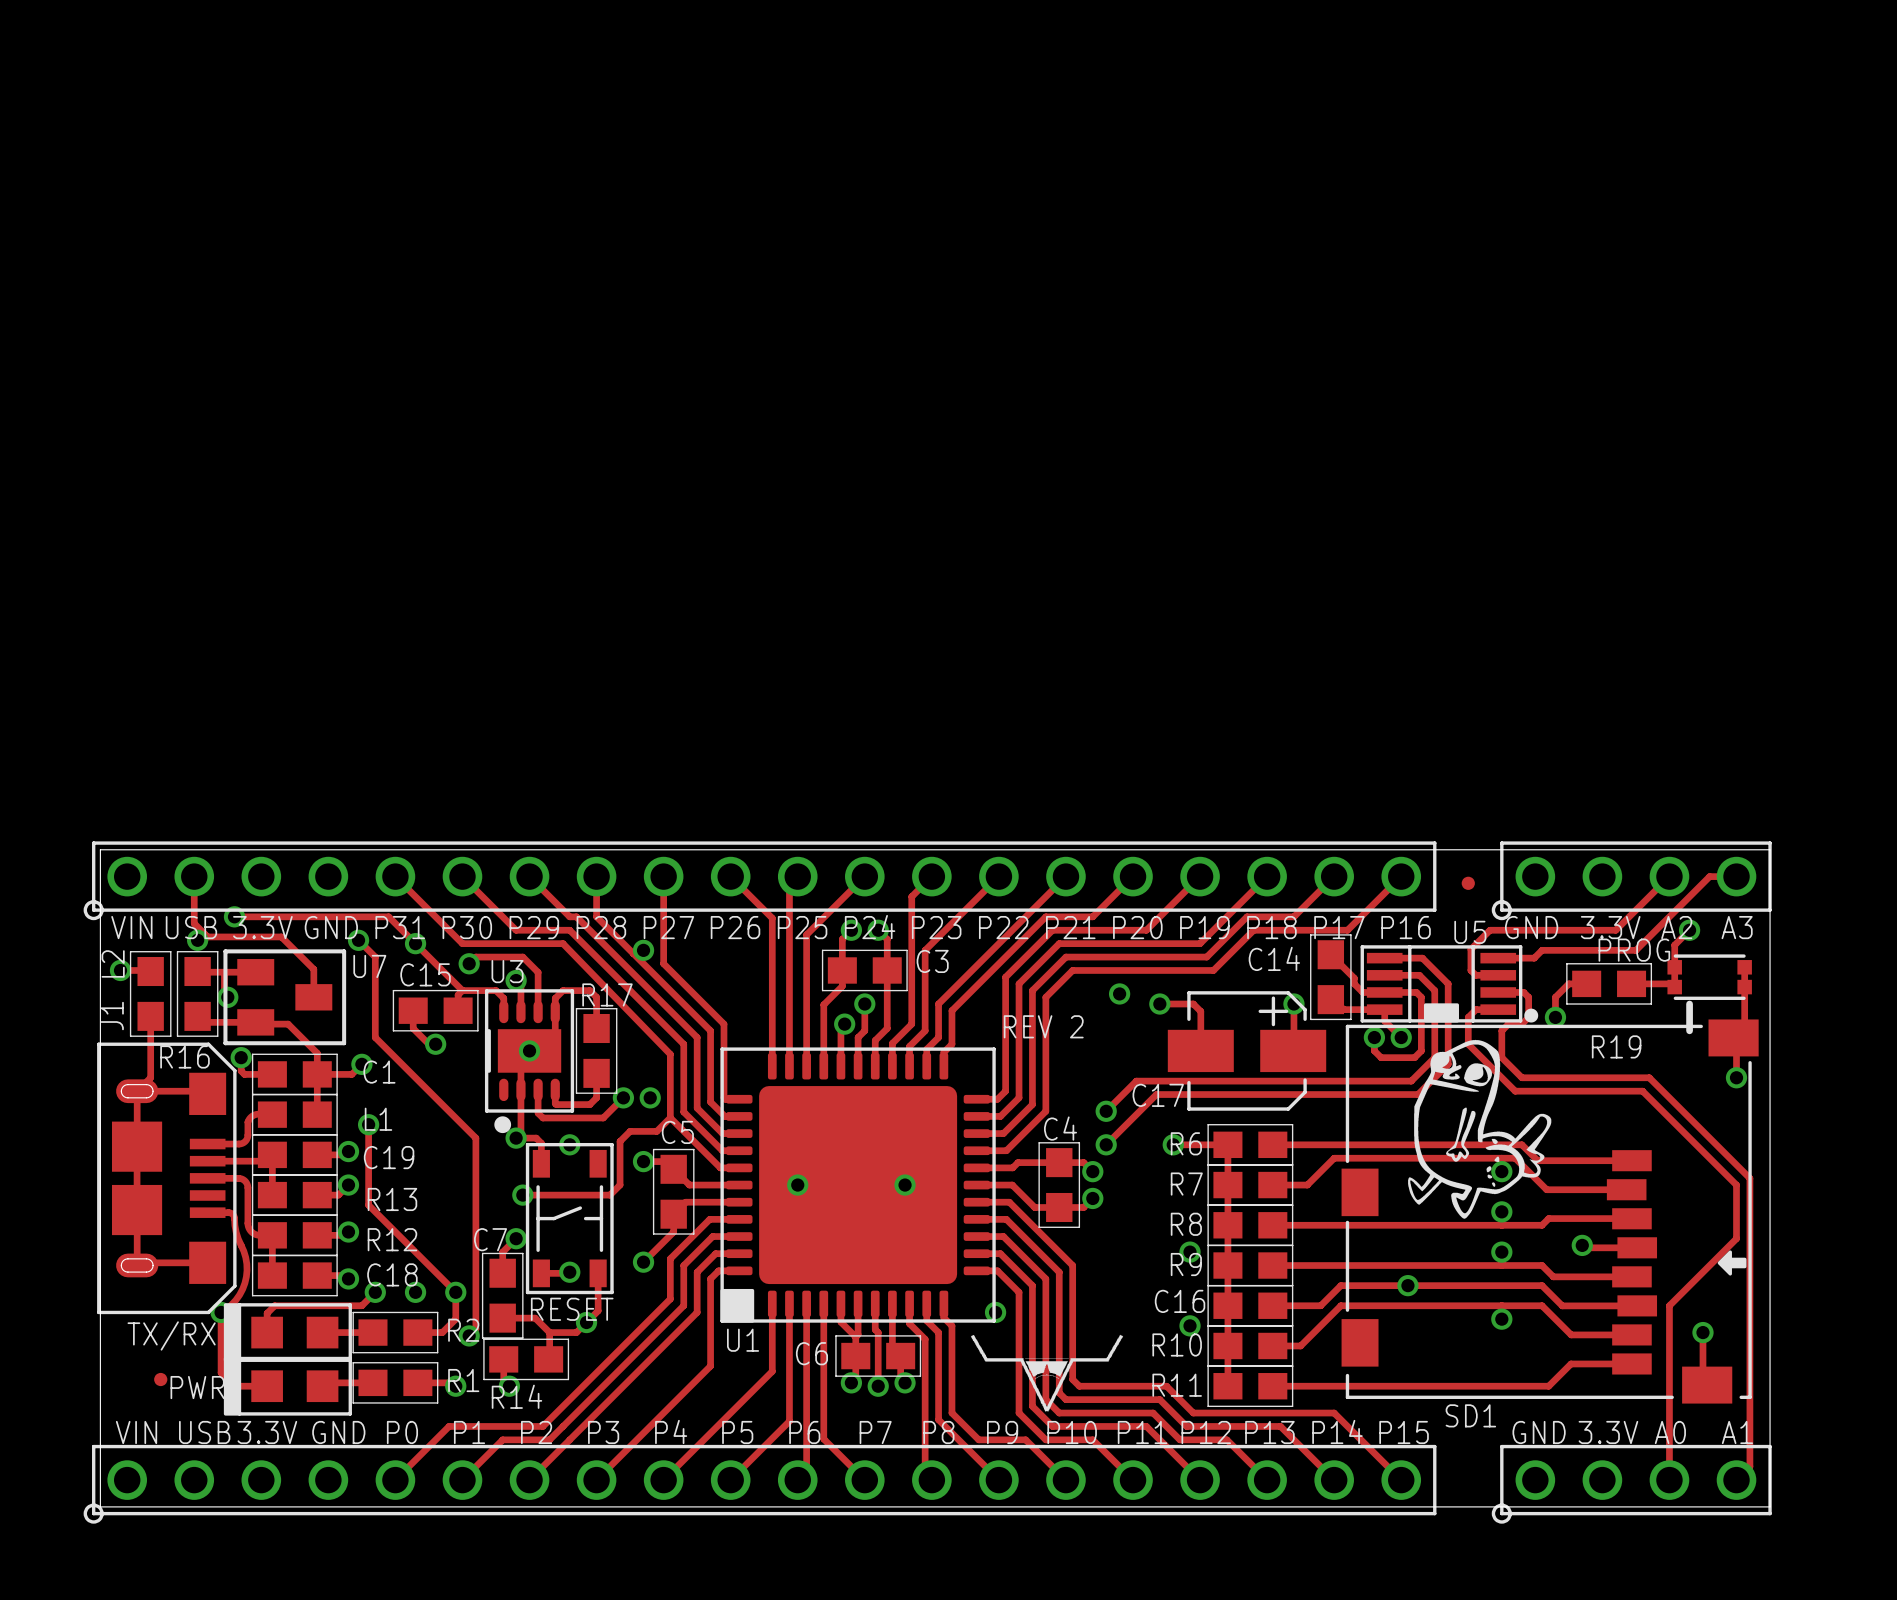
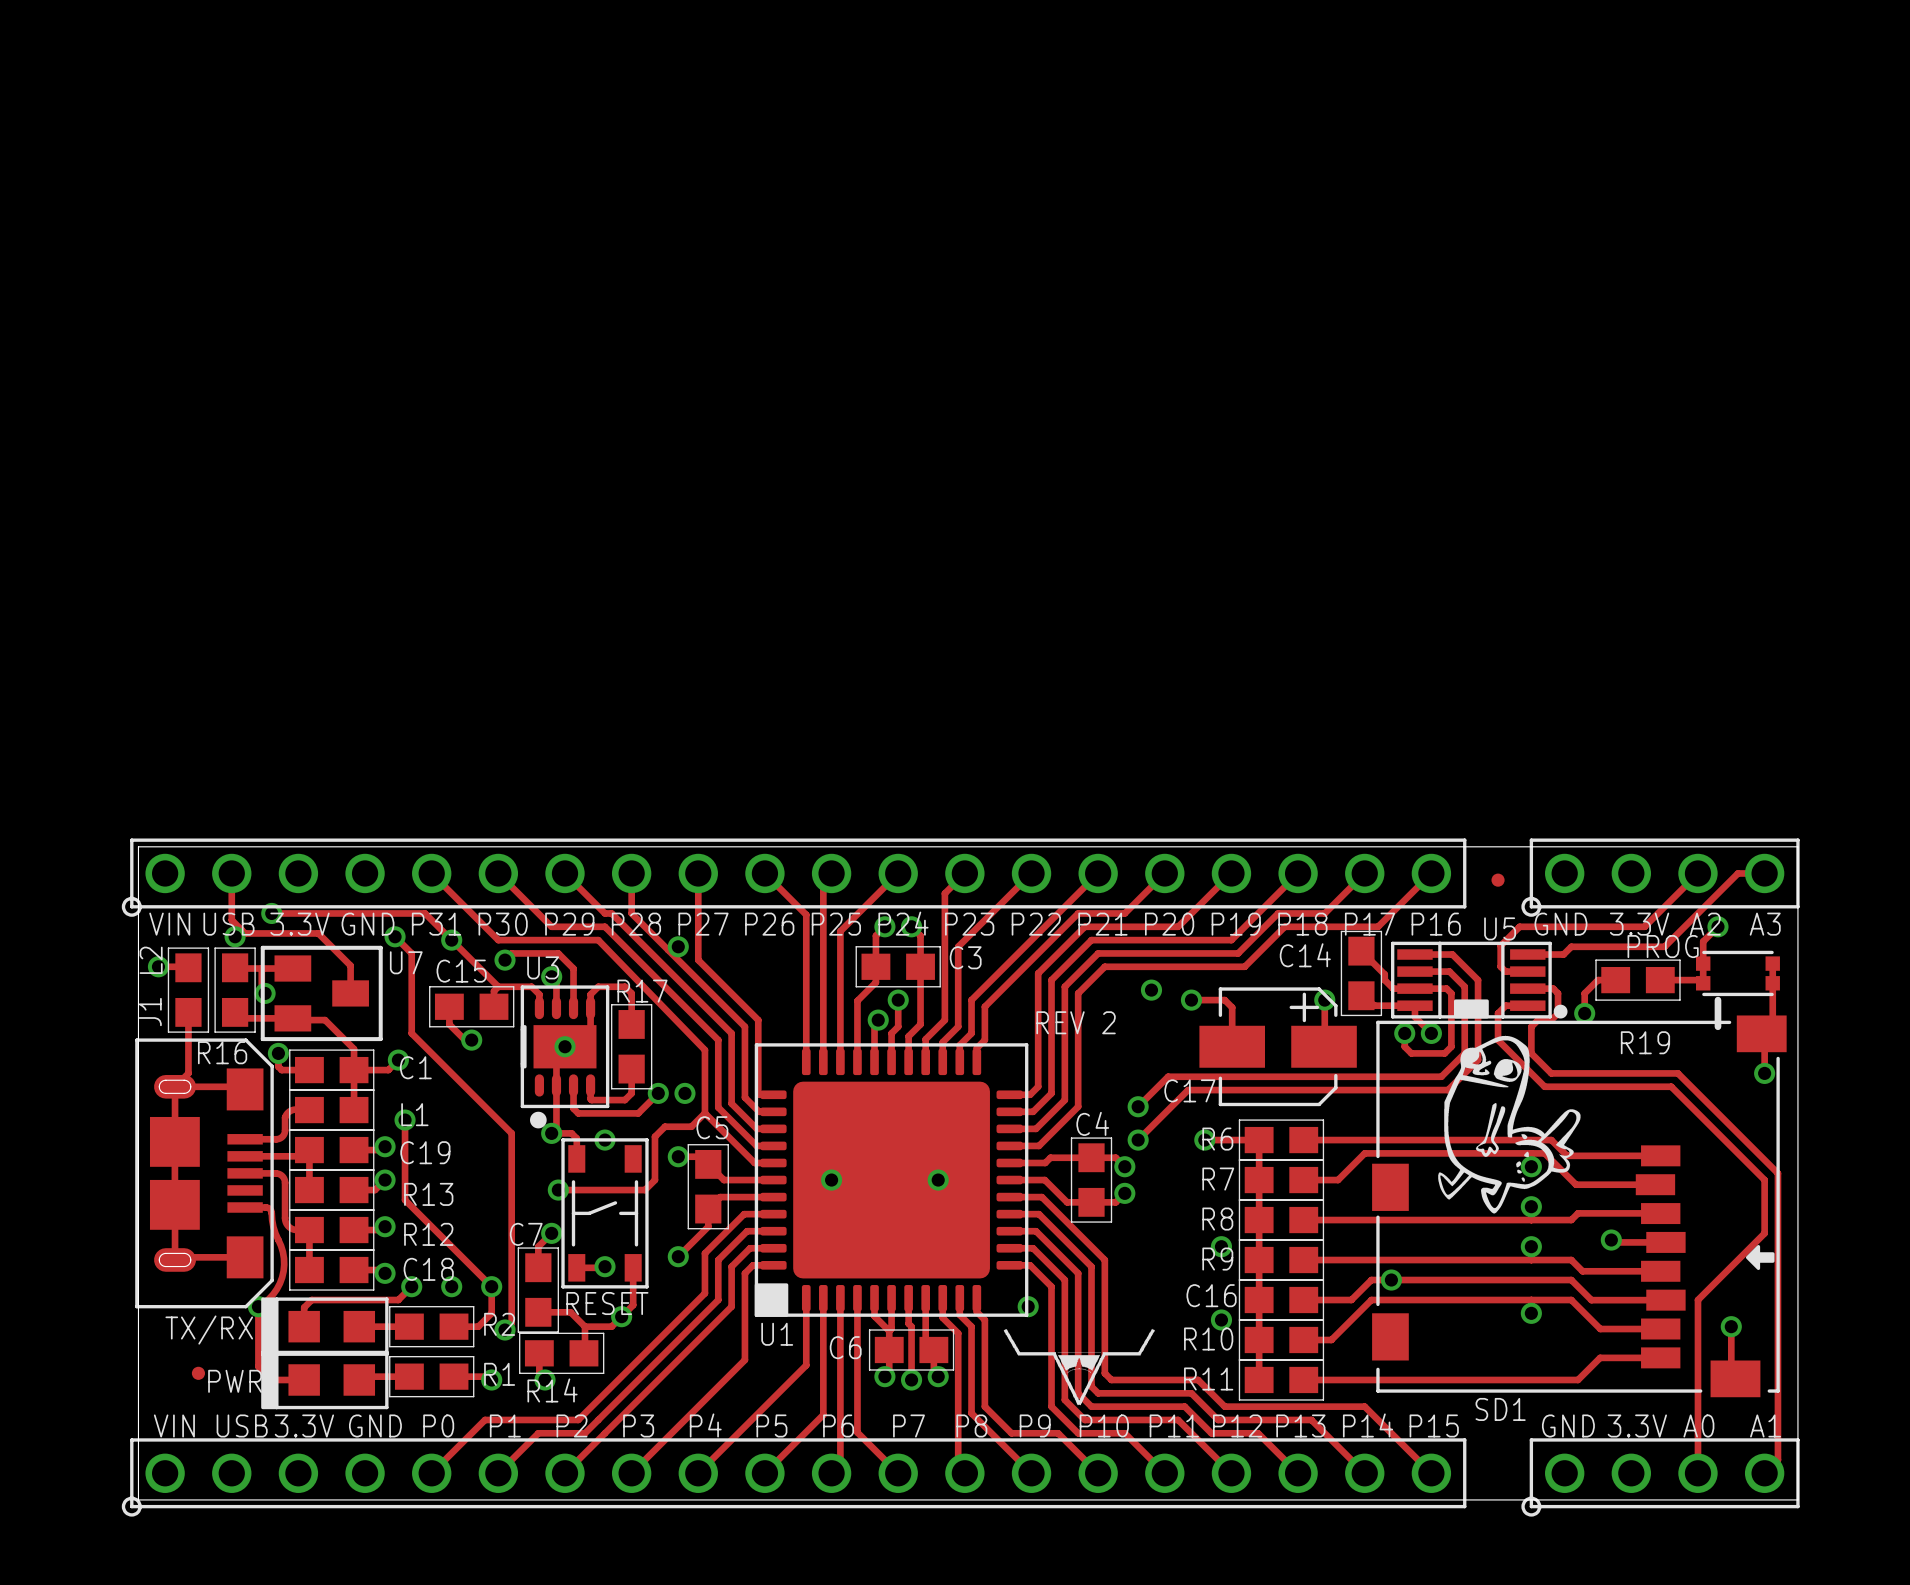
via position: (1407, 1285) -> (1391, 1280)

